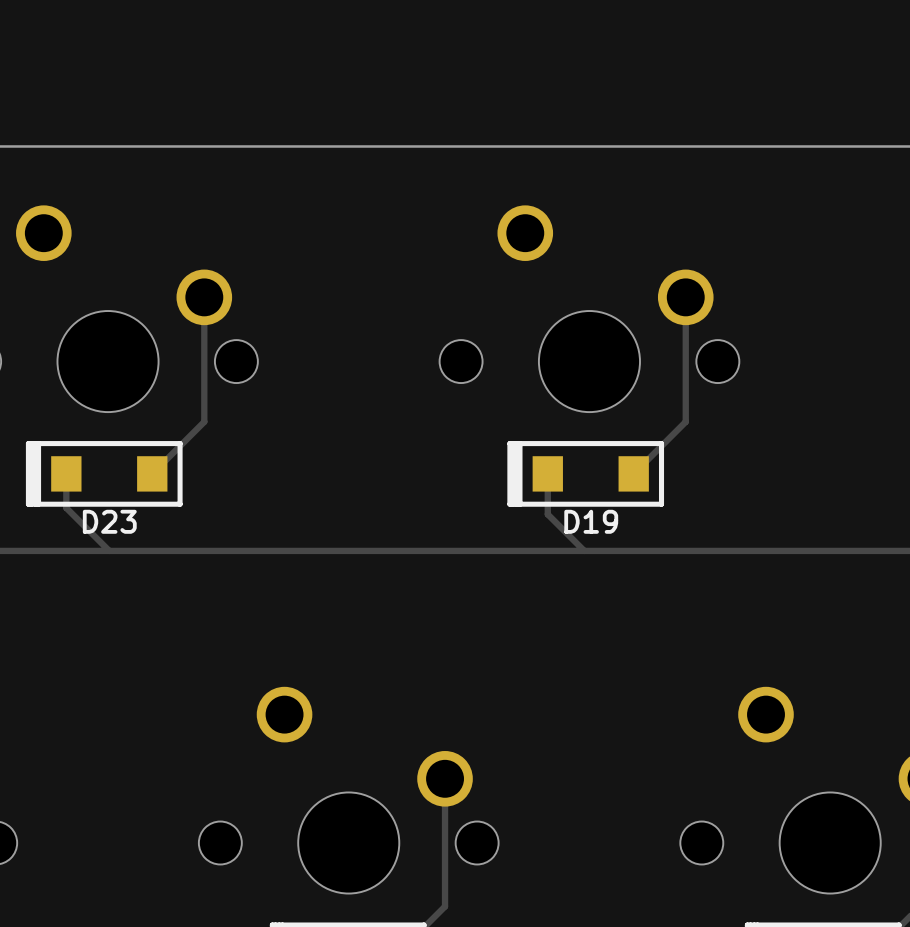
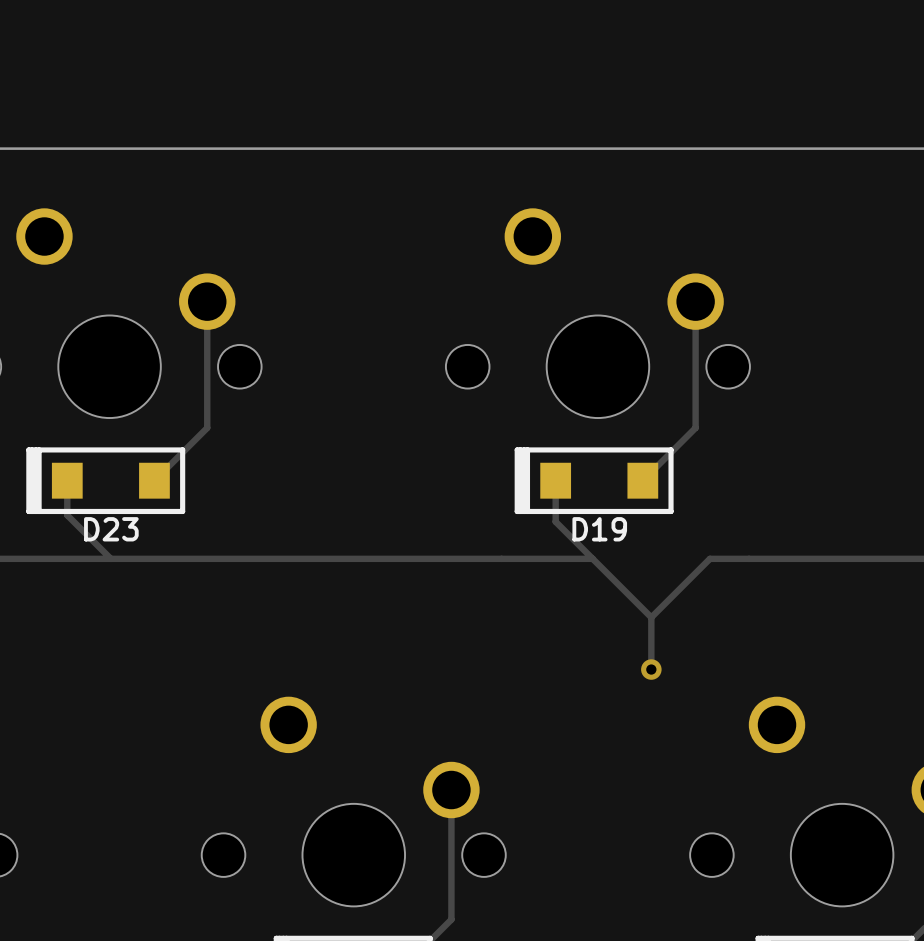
track: none -> (592, 558) (651, 617)
track: (699, 550) (584, 550) -> (709, 558) (651, 617)
track: none -> (651, 617) (651, 669)
via: none -> (651, 669)

